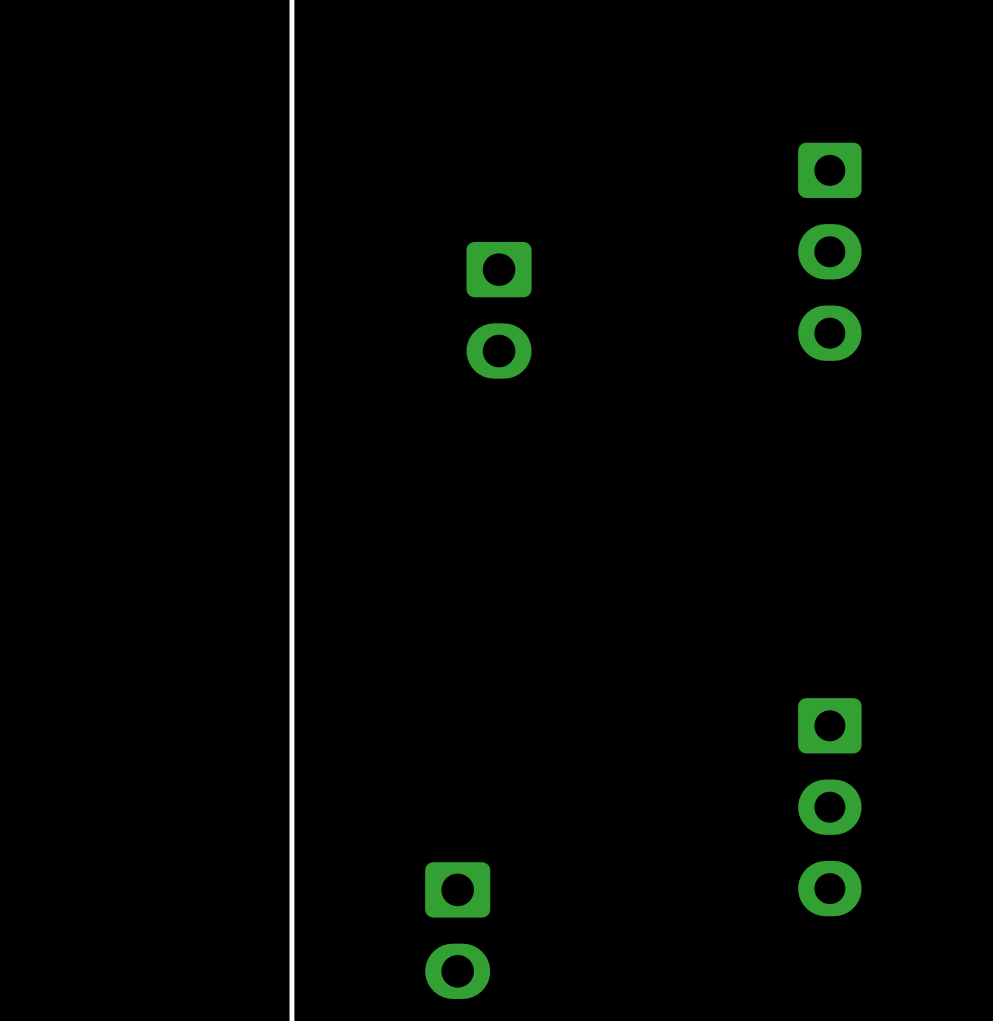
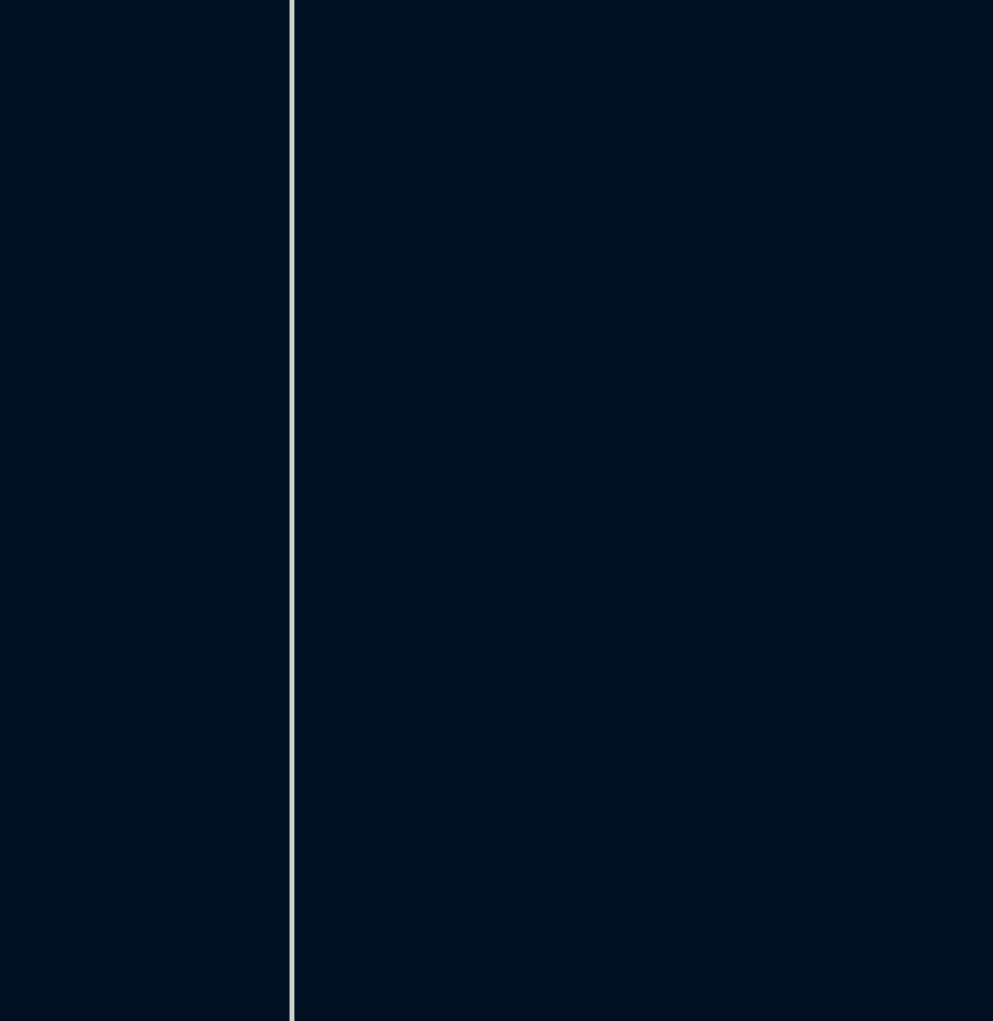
part: (829, 251) -> none
part: (499, 310) -> none
part: (829, 807) -> none
part: (457, 930) -> none

